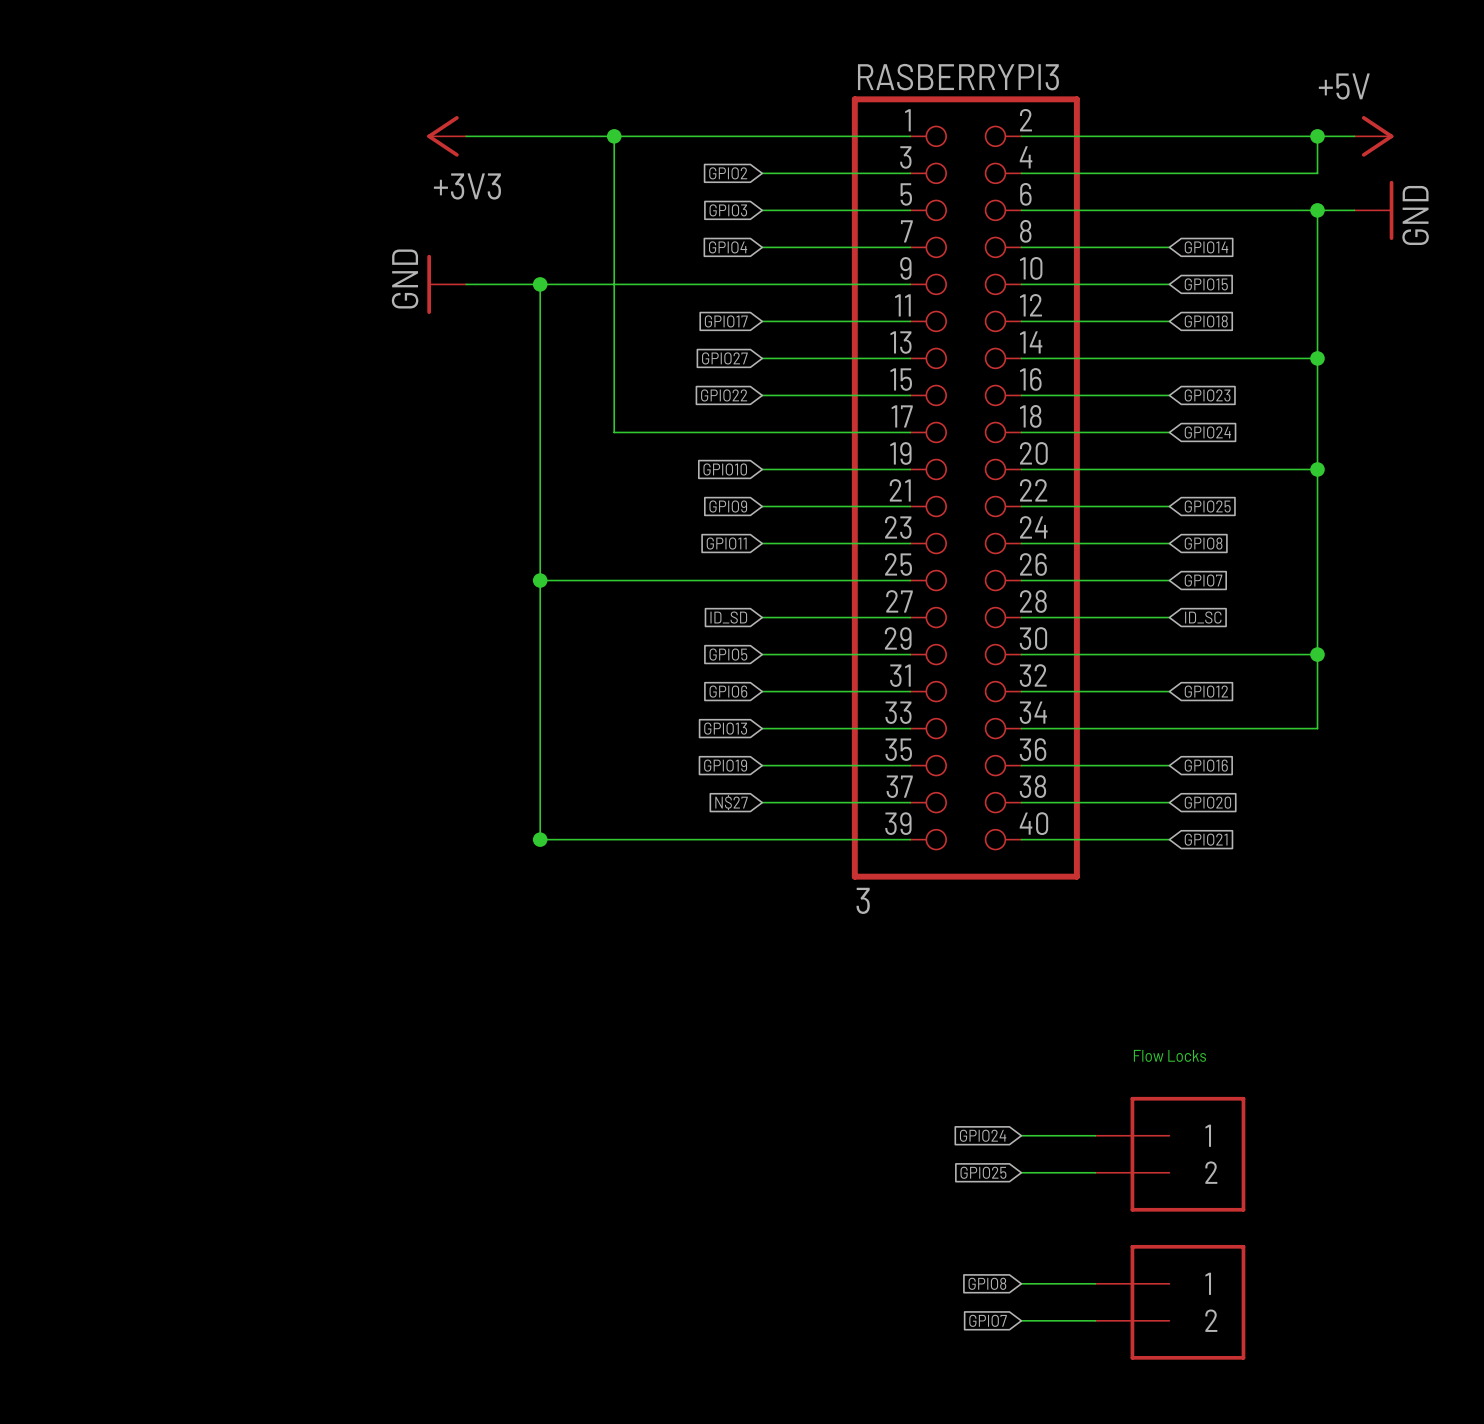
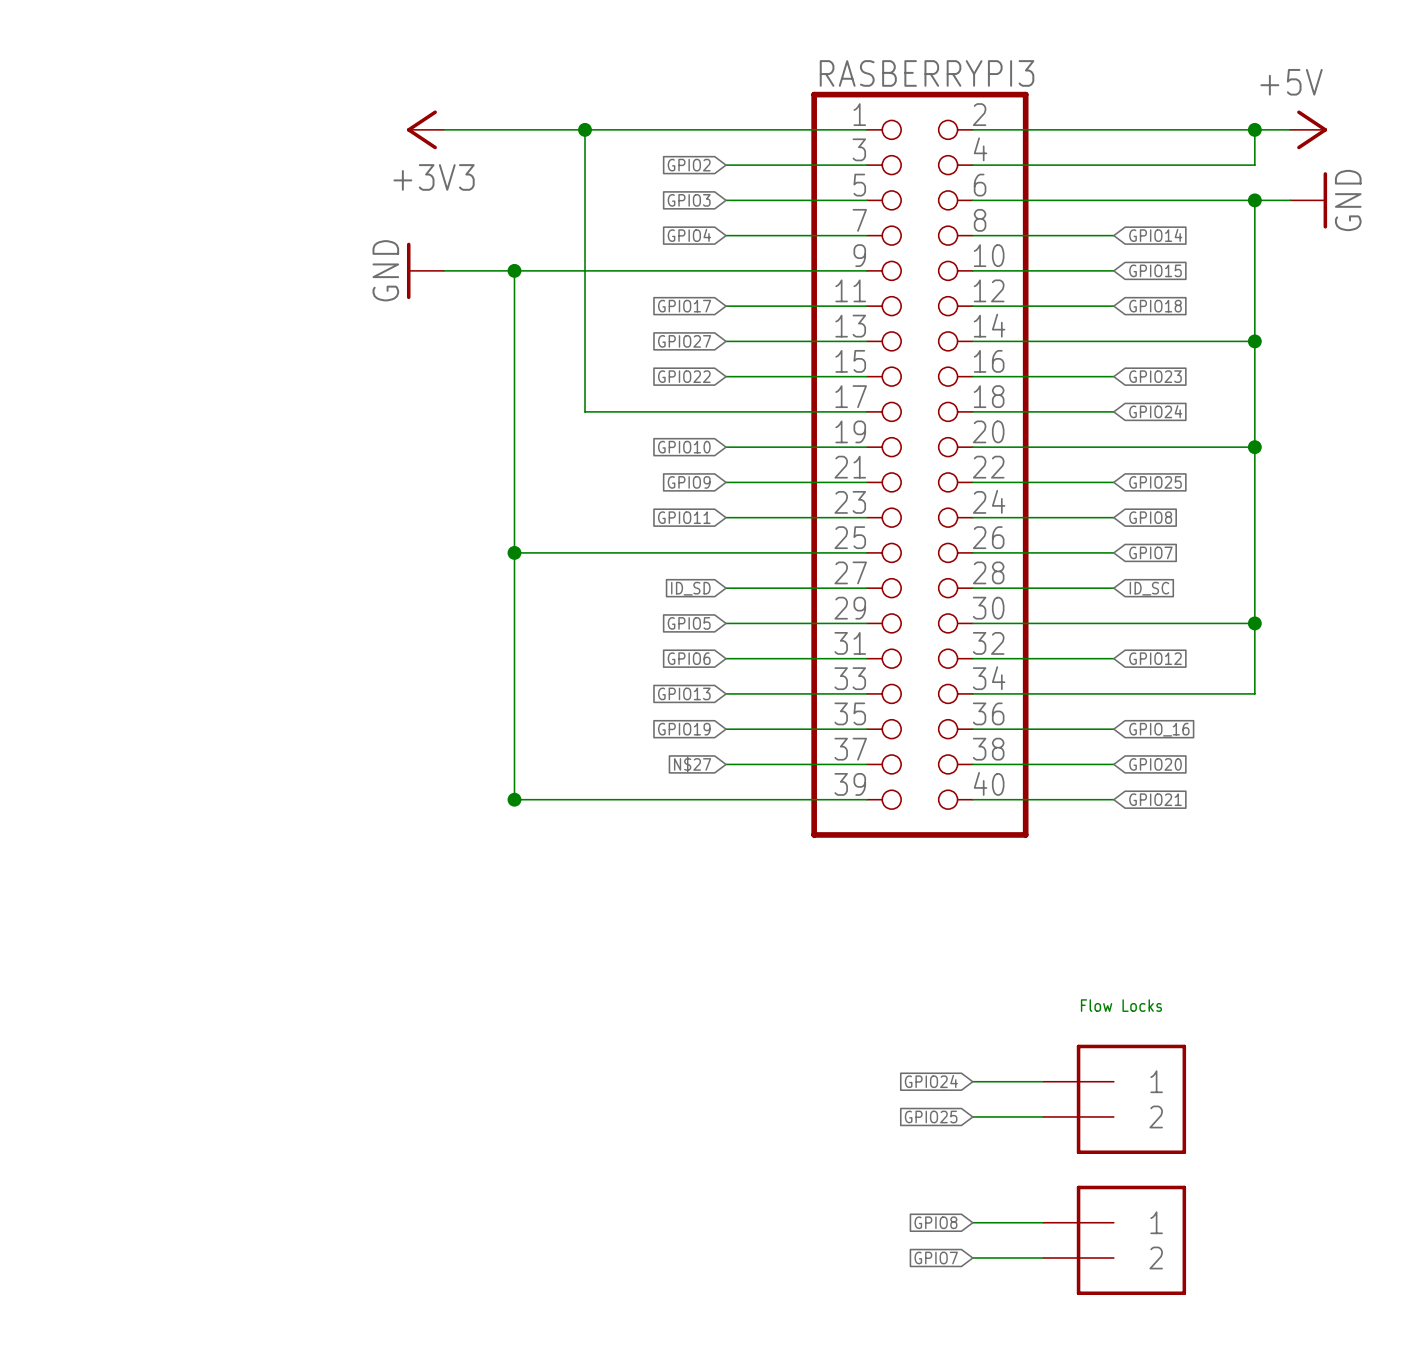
global label: GPIO16 (1206, 765) -> GPIO_16 (1159, 729)
RASBERRYPI3 value: 3 (863, 900) -> none

